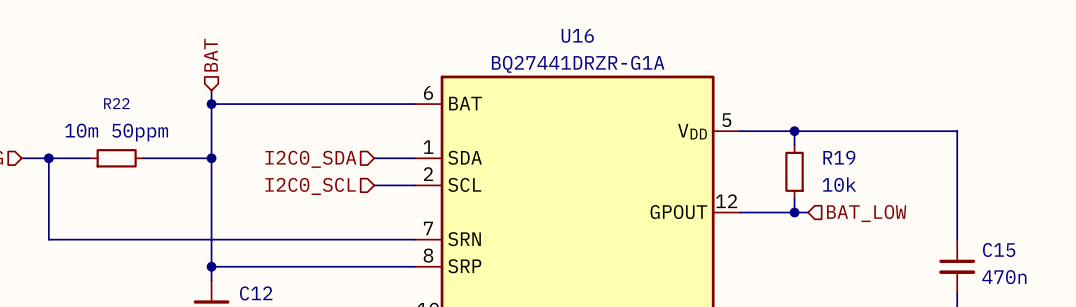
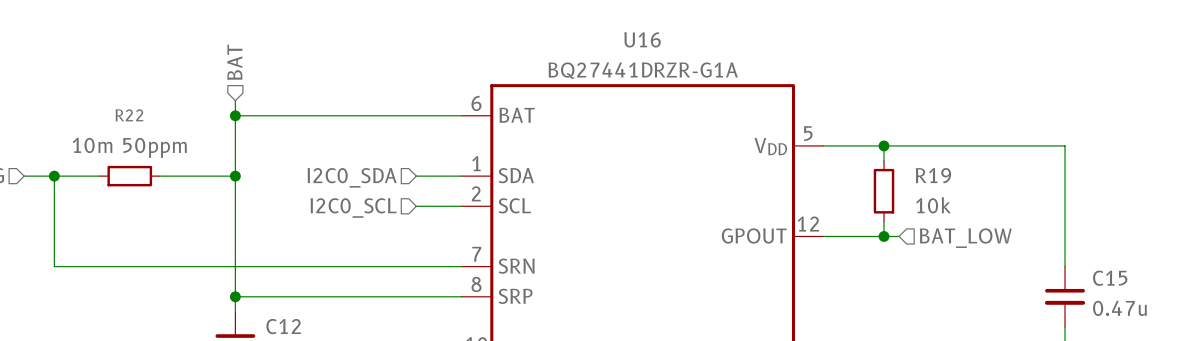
C15 value: 470n (1004, 277) -> 0.47u (1119, 308)

